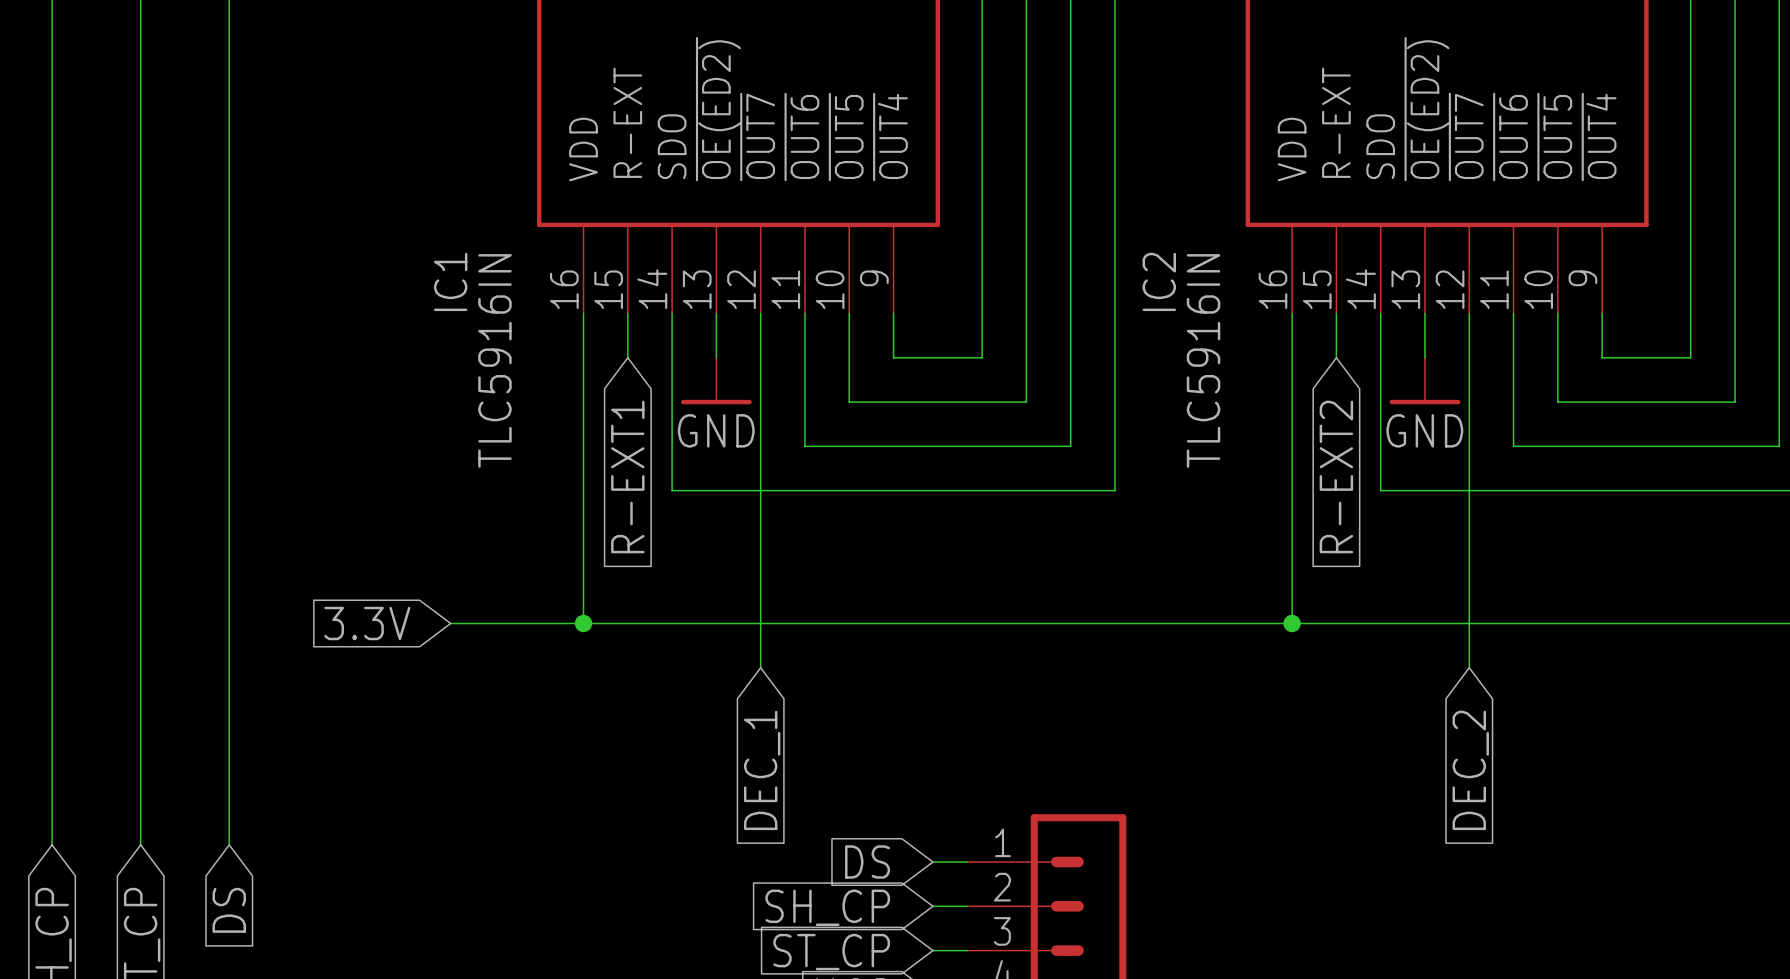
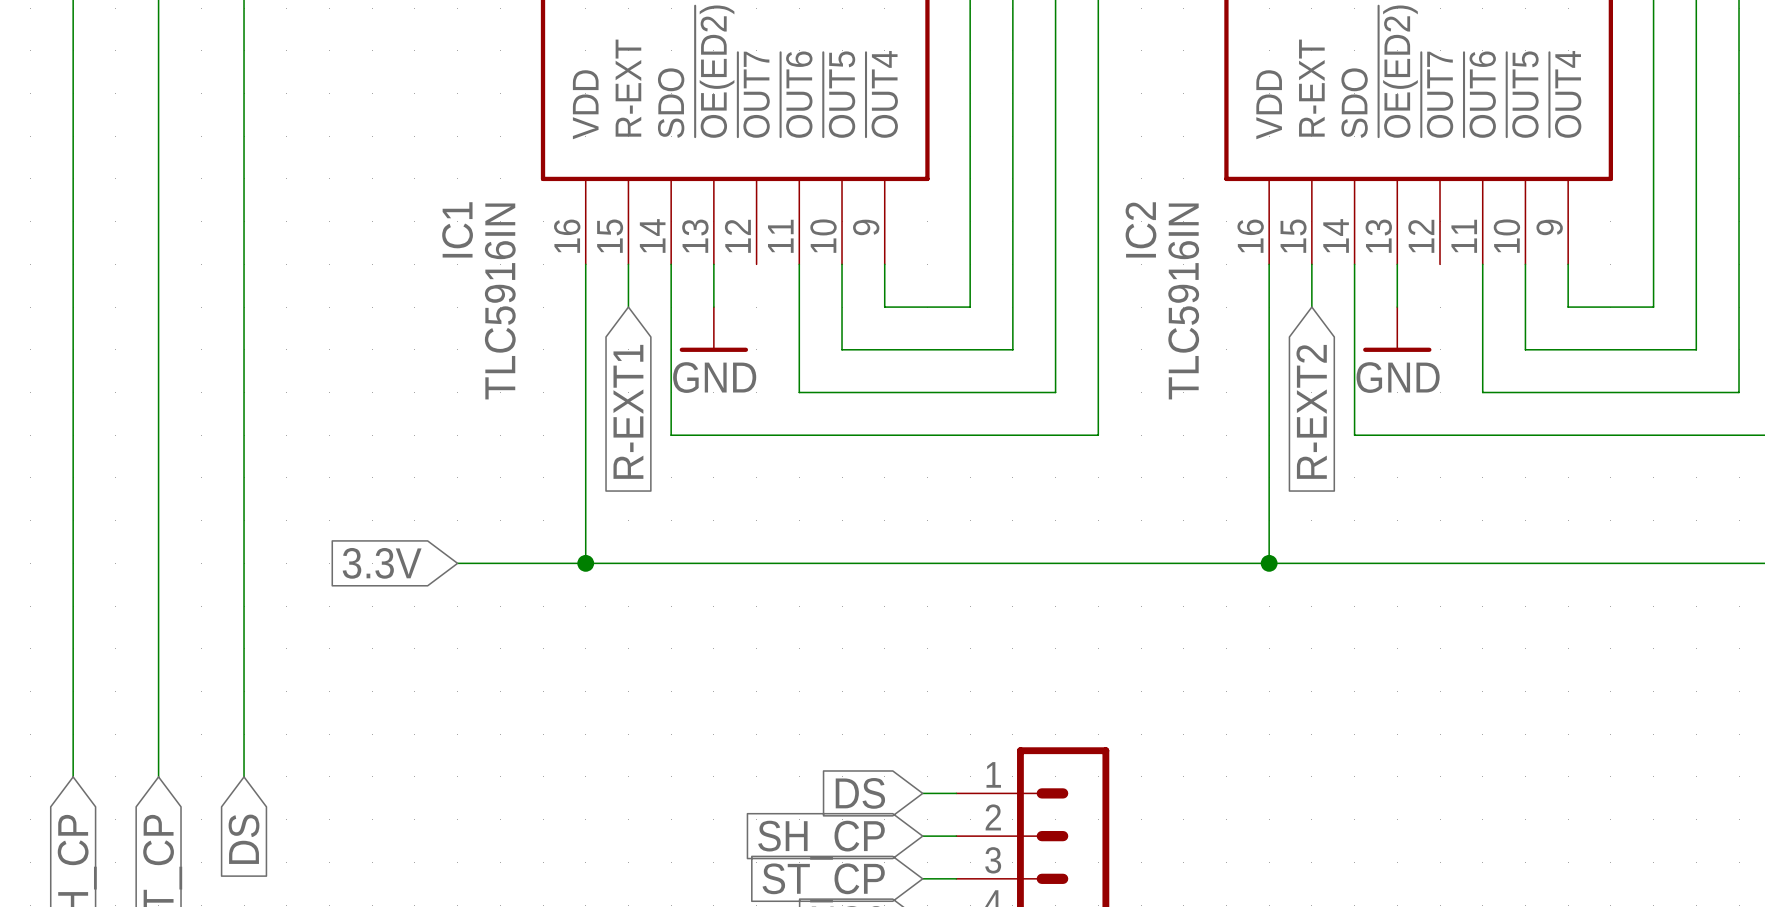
wire: (760, 313) (760, 667) -> none
wire: (1469, 313) (1469, 667) -> none
global label: DEC_1 (762, 770) -> none
global label: DEC_2 (1470, 770) -> none

